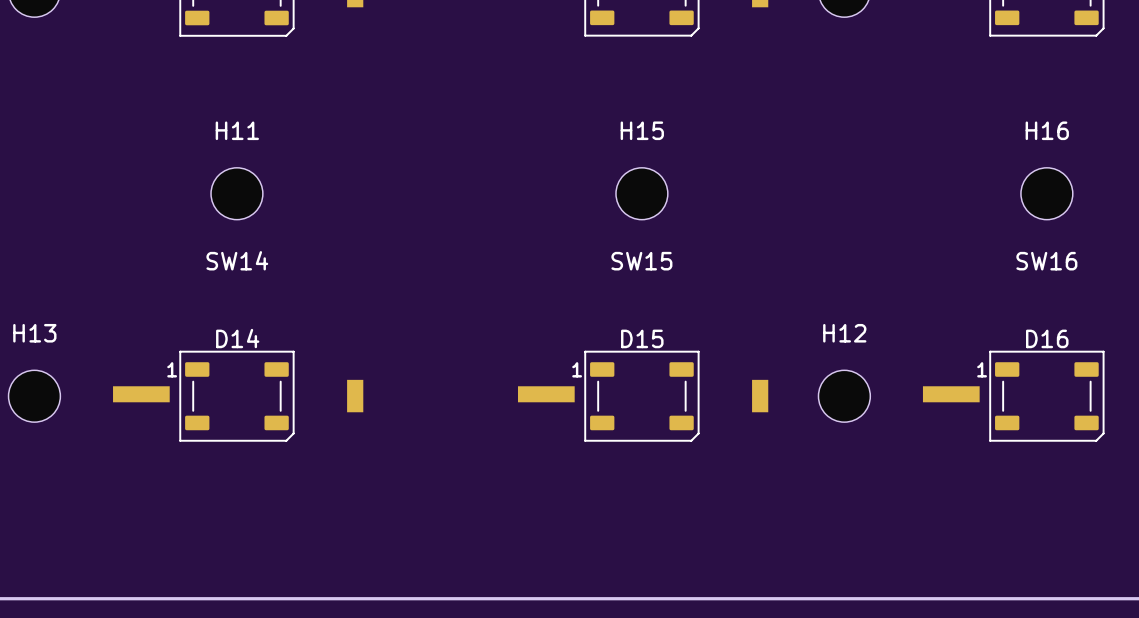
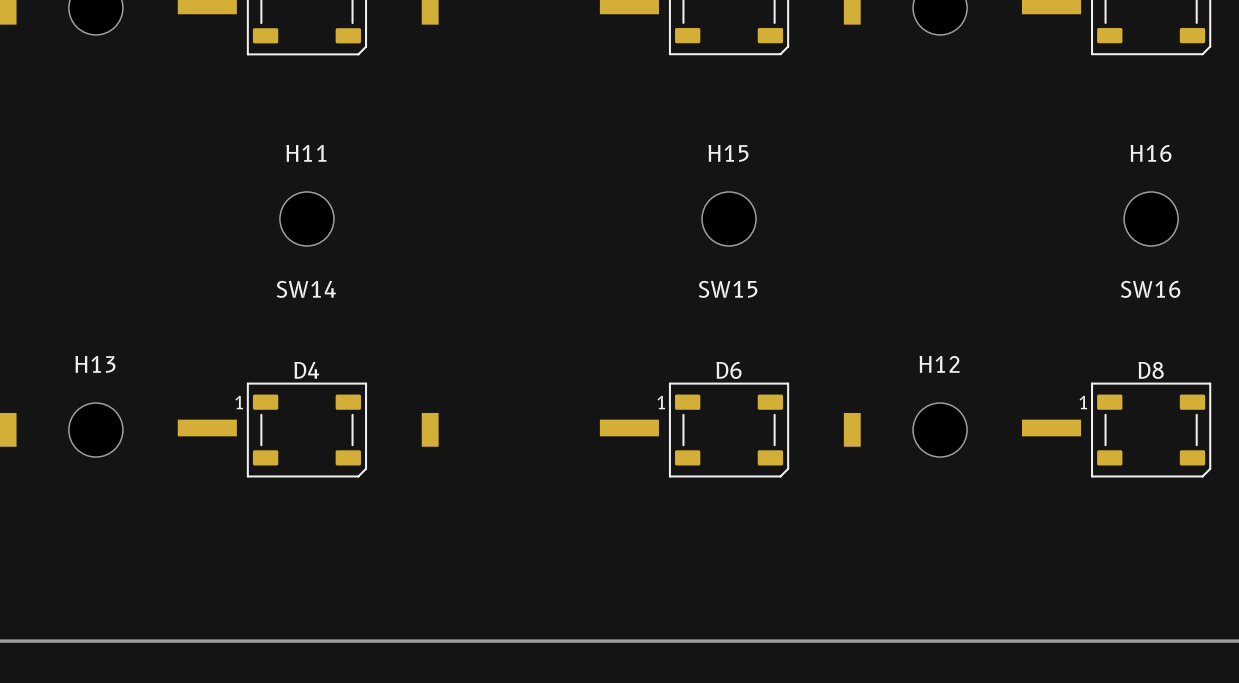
D14 name: D14 (237, 338) -> D4 (306, 370)
D15 name: D15 (642, 338) -> D6 (729, 370)
D16 name: D16 (1047, 338) -> D8 (1151, 370)

